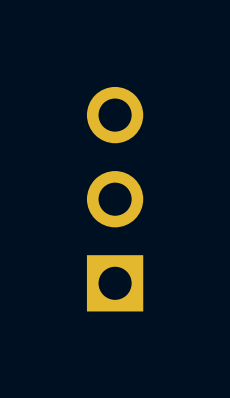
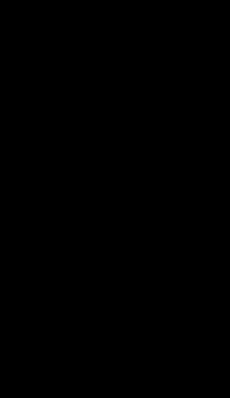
part: (115, 199) -> none

